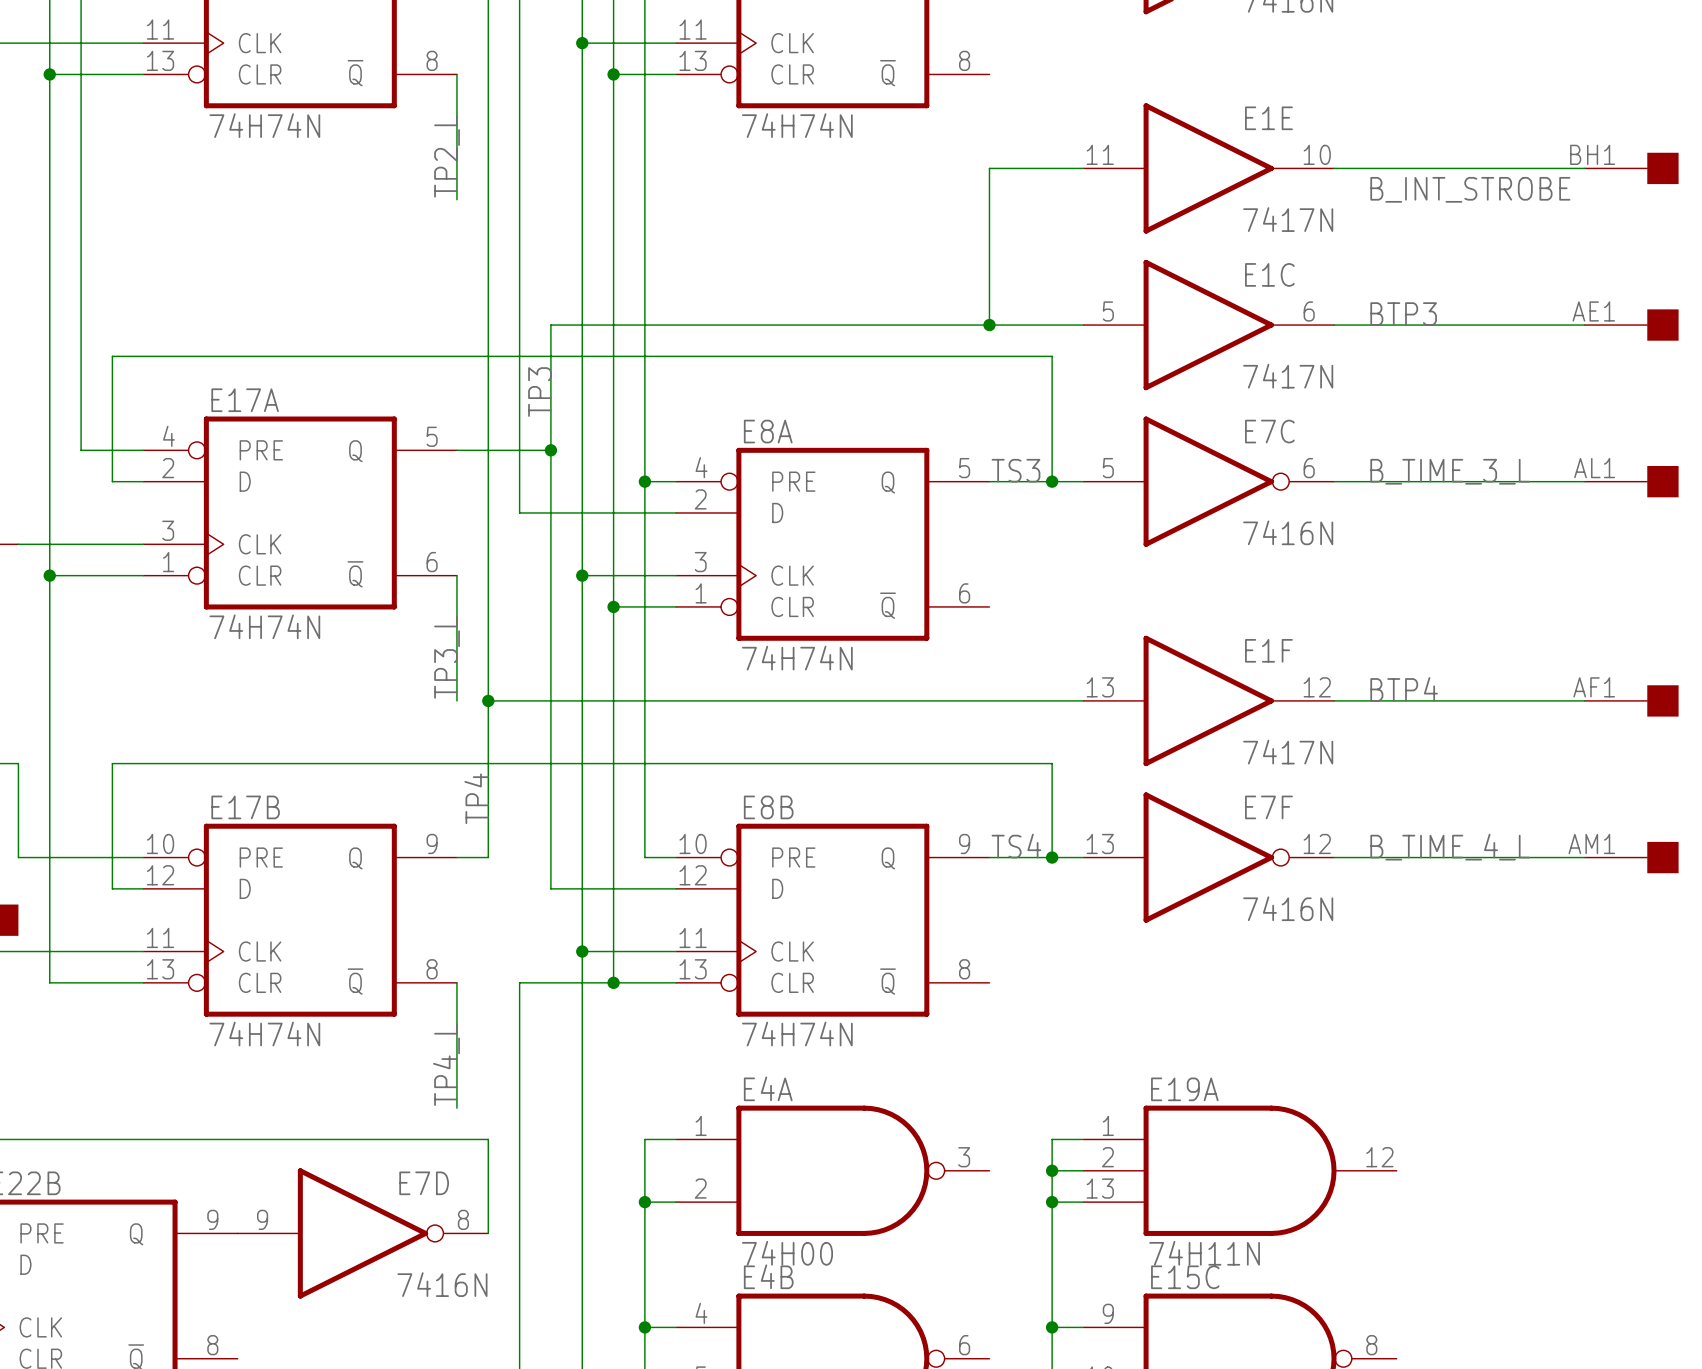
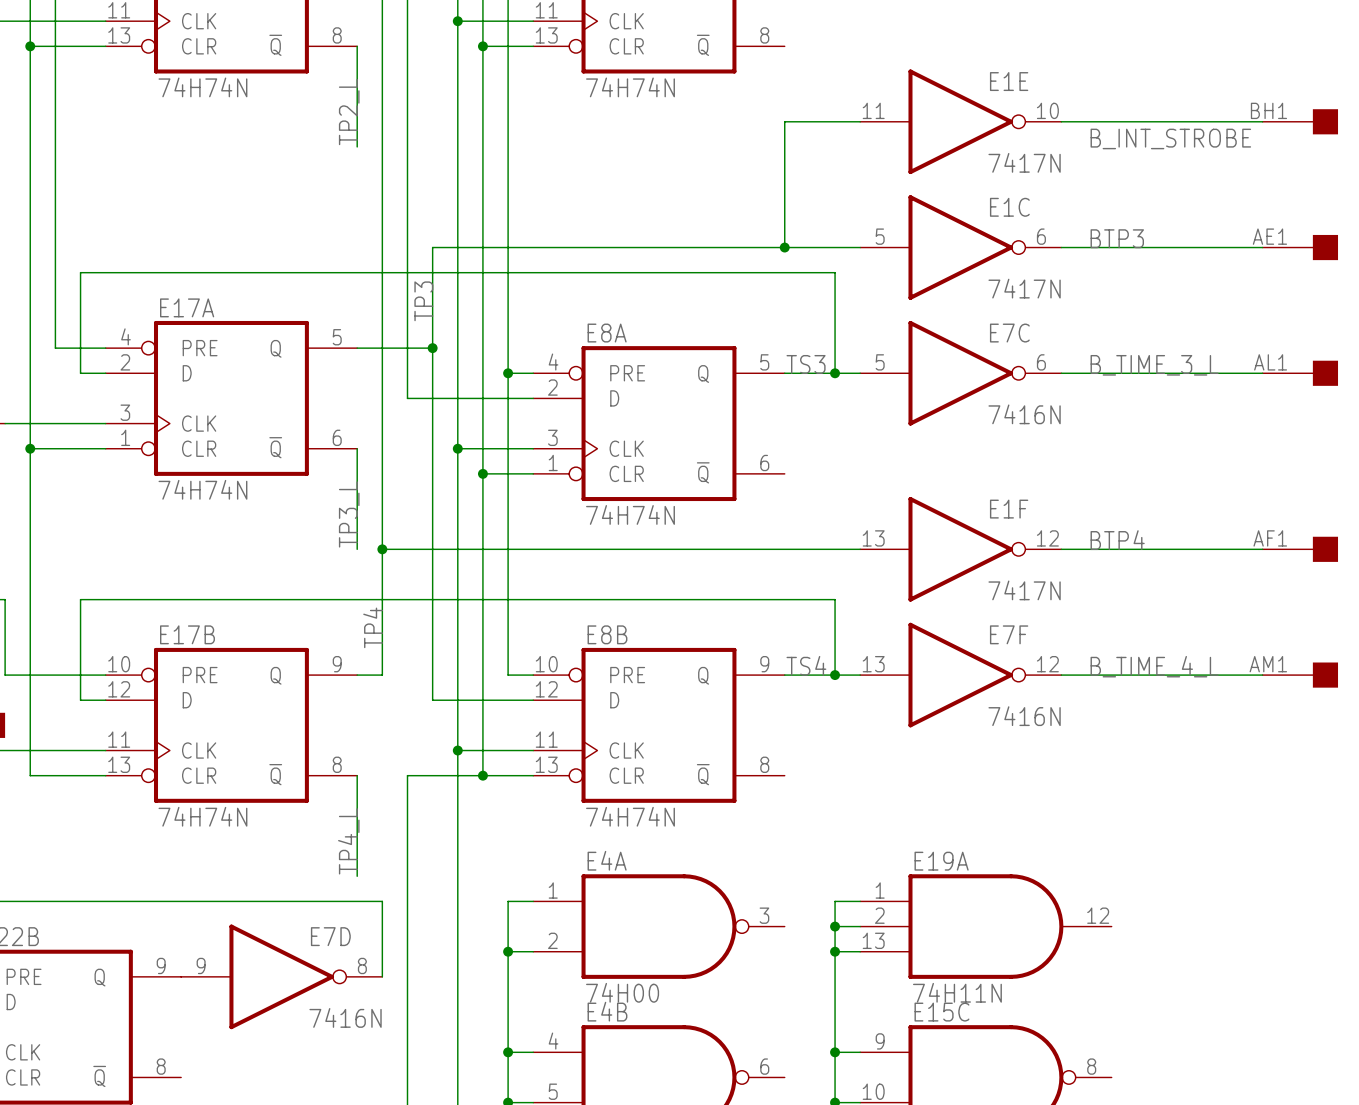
E1E symbol: [1083, 103, 1335, 234] -> [860, 69, 1062, 175]
E1C symbol: [1083, 259, 1335, 391] -> [860, 195, 1062, 300]
E1F symbol: [1083, 635, 1335, 767] -> [860, 497, 1062, 602]

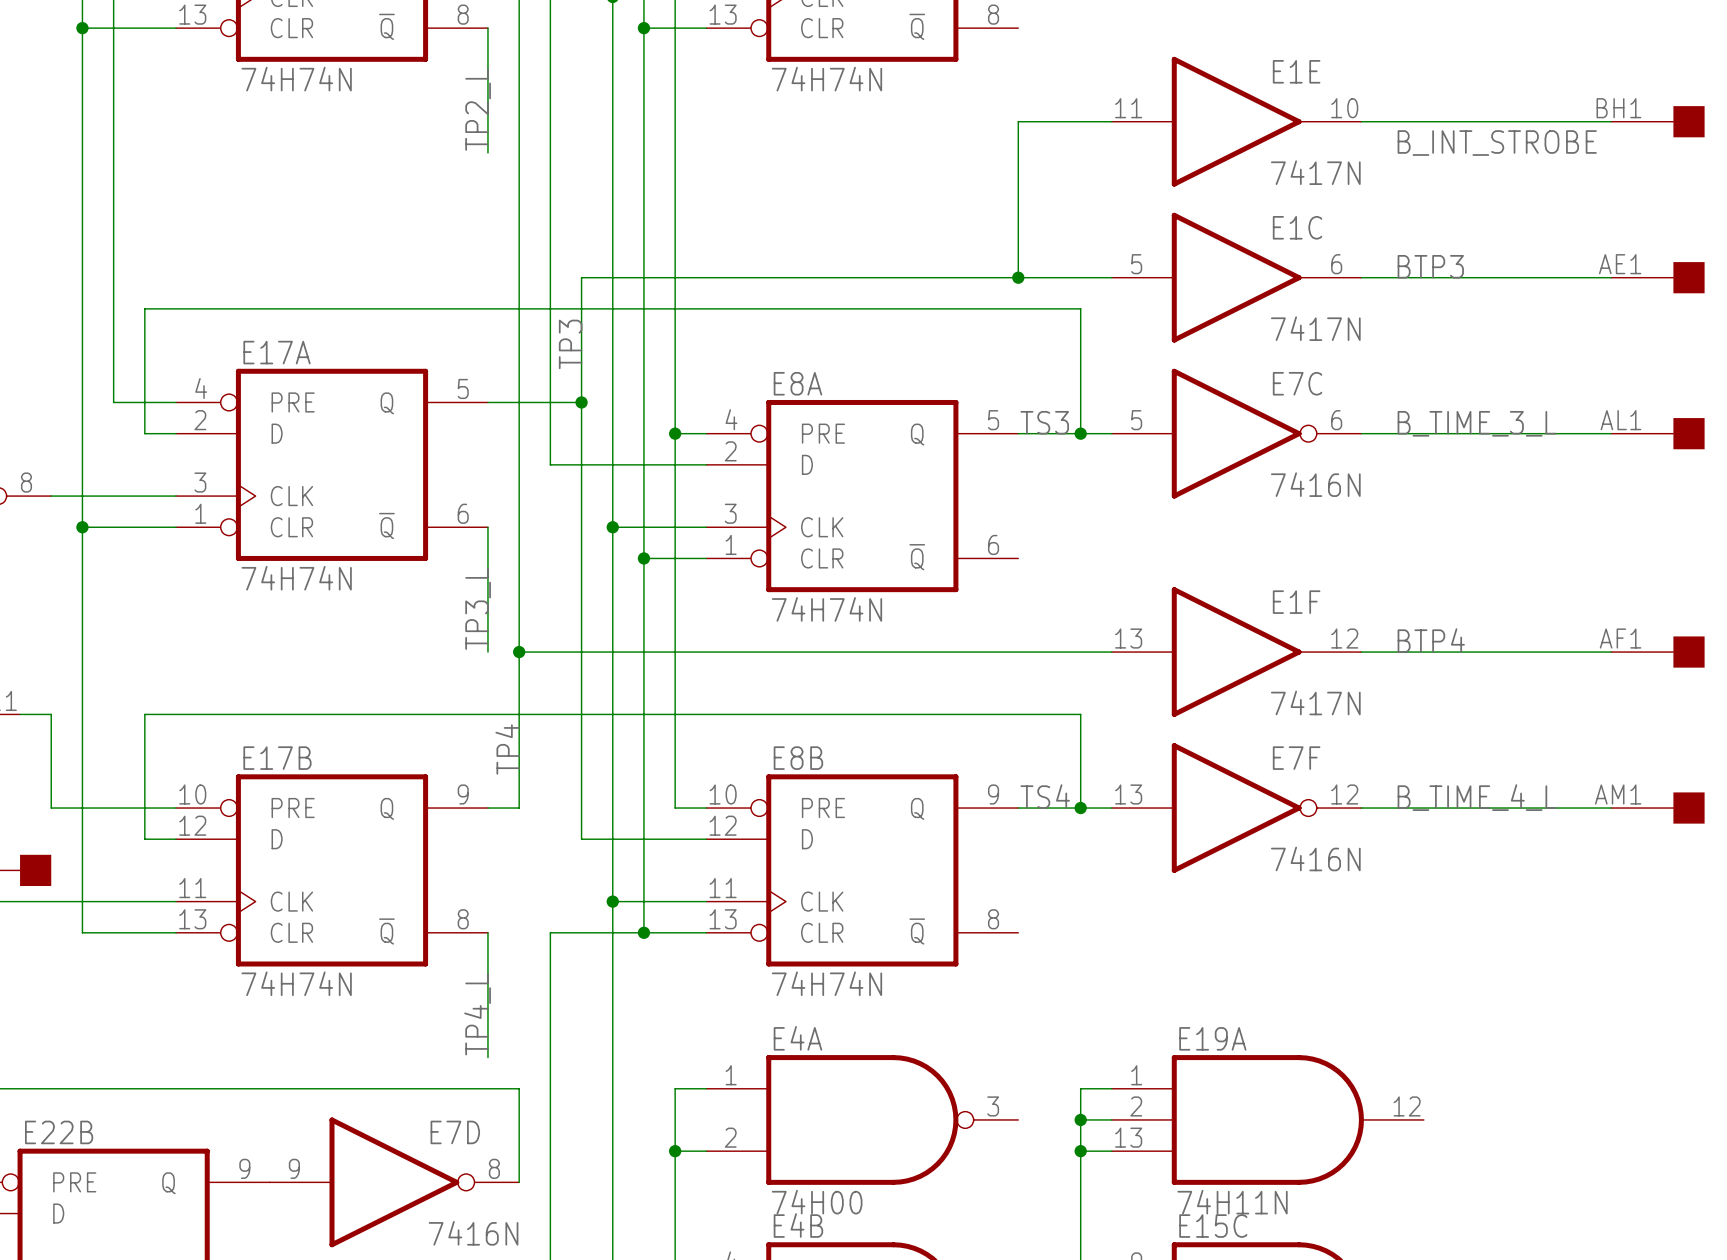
E1E symbol: [860, 69, 1062, 175] -> [1111, 56, 1362, 187]
E1C symbol: [860, 195, 1062, 300] -> [1111, 212, 1362, 343]
E1F symbol: [860, 497, 1062, 602] -> [1111, 587, 1362, 717]

